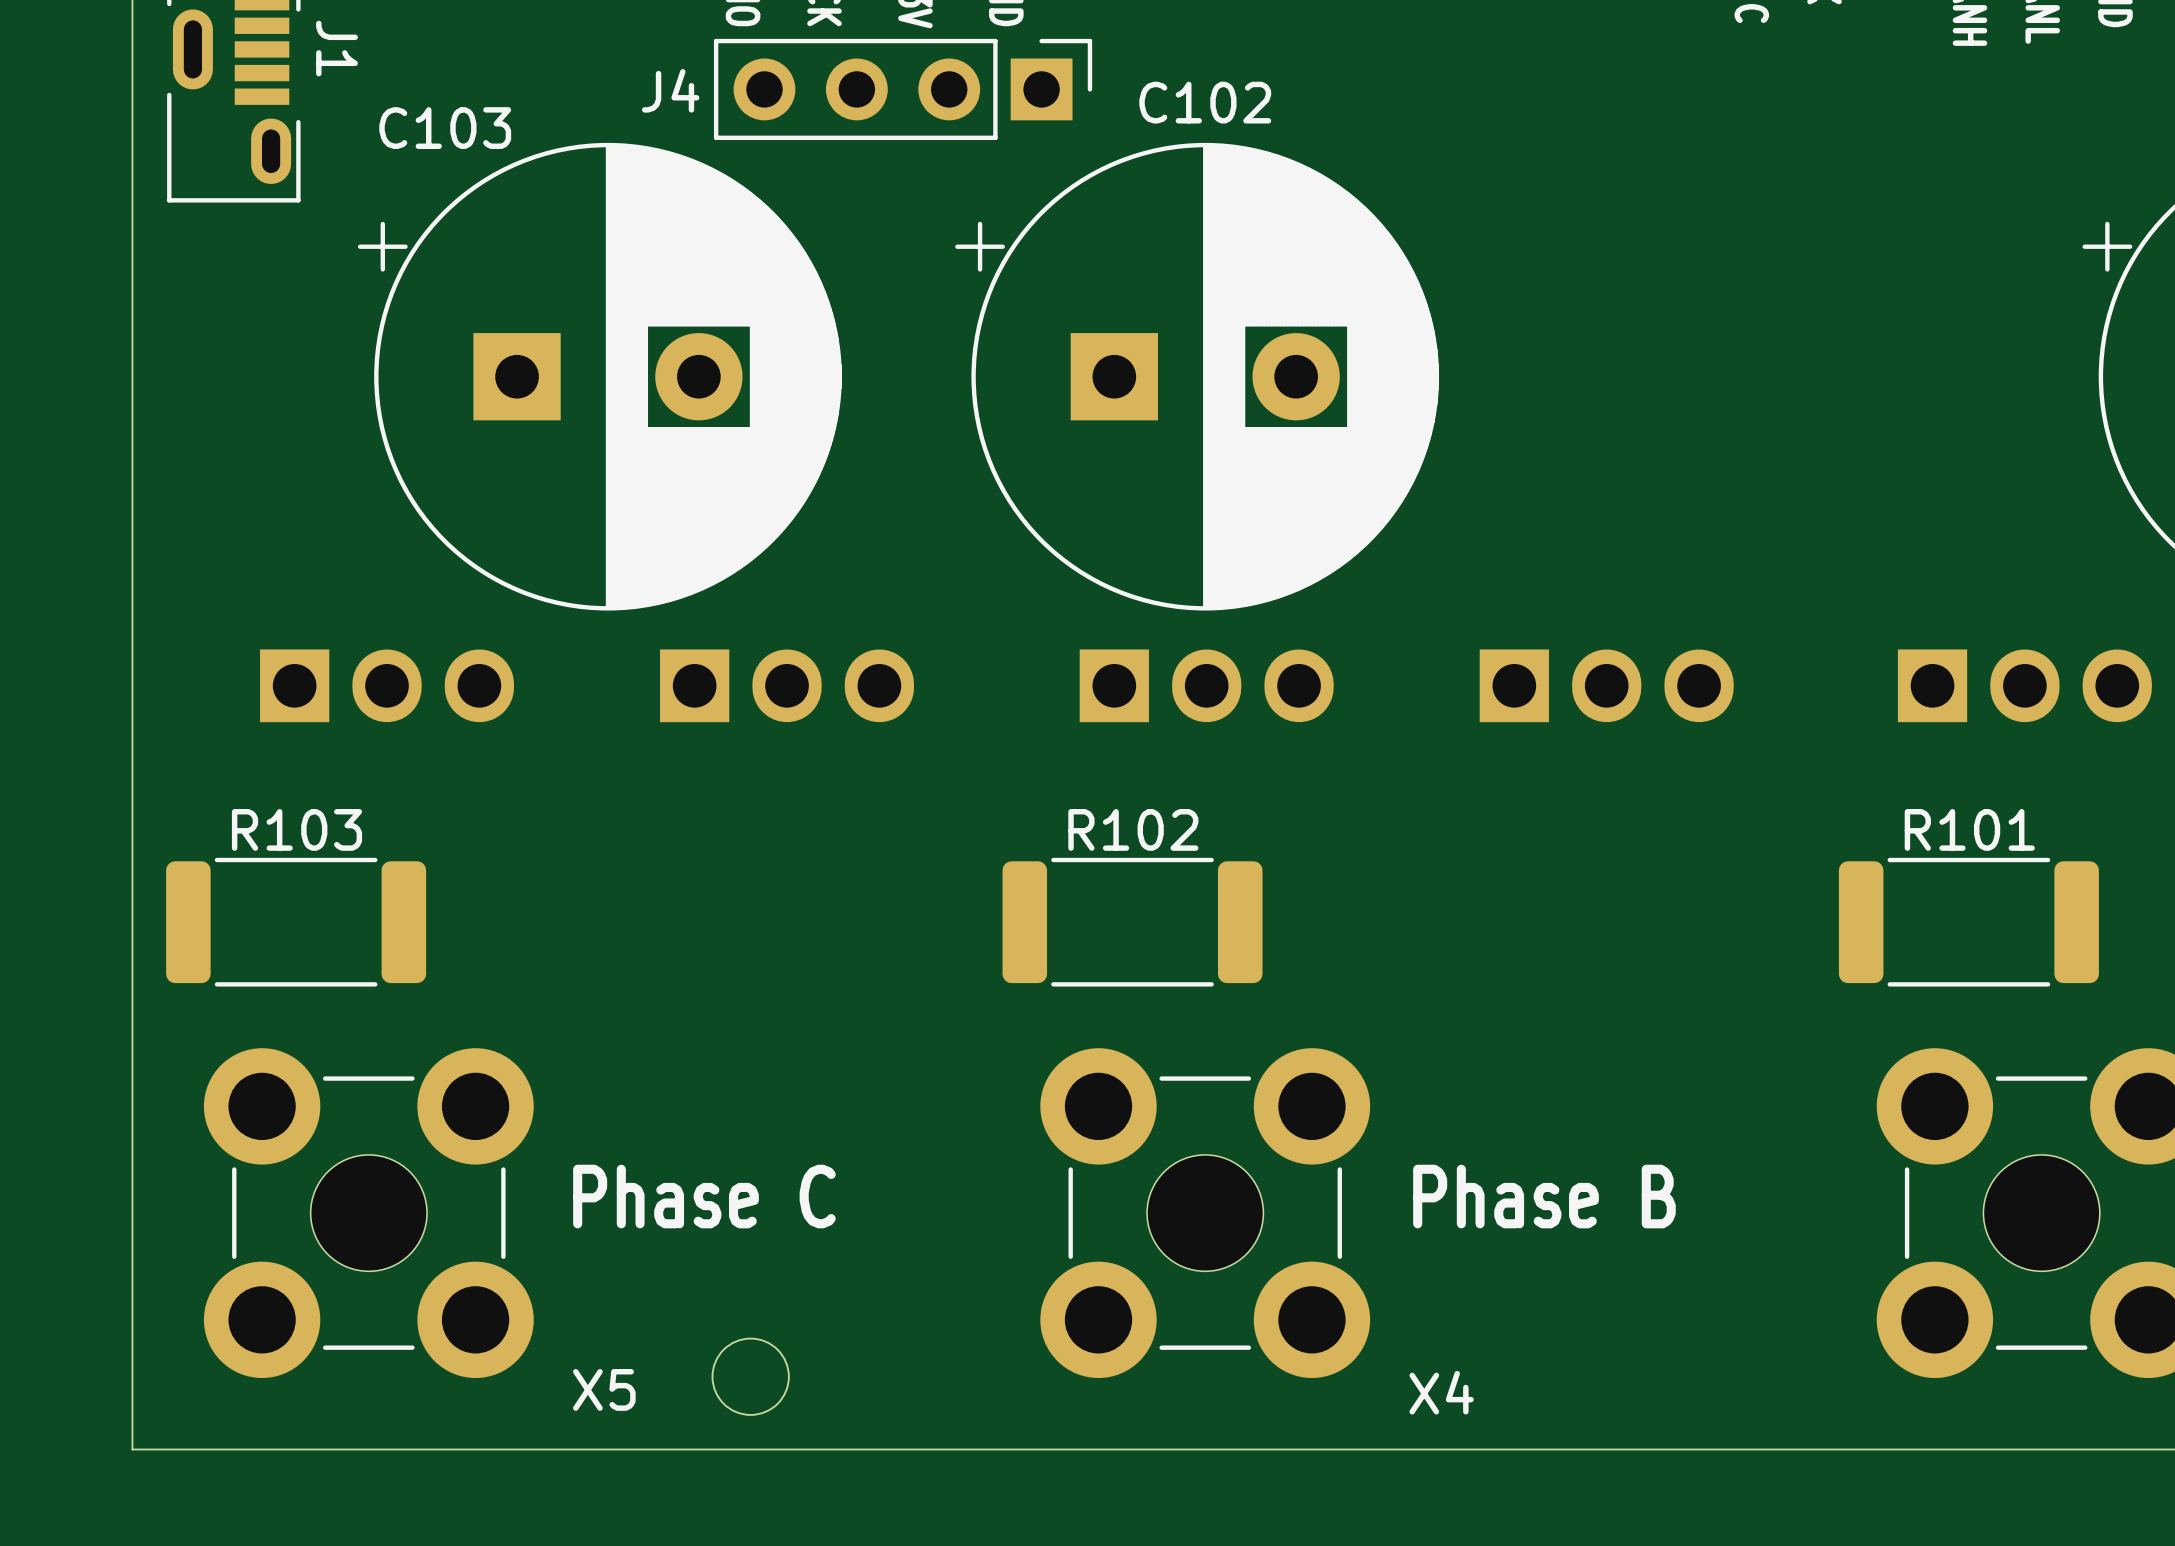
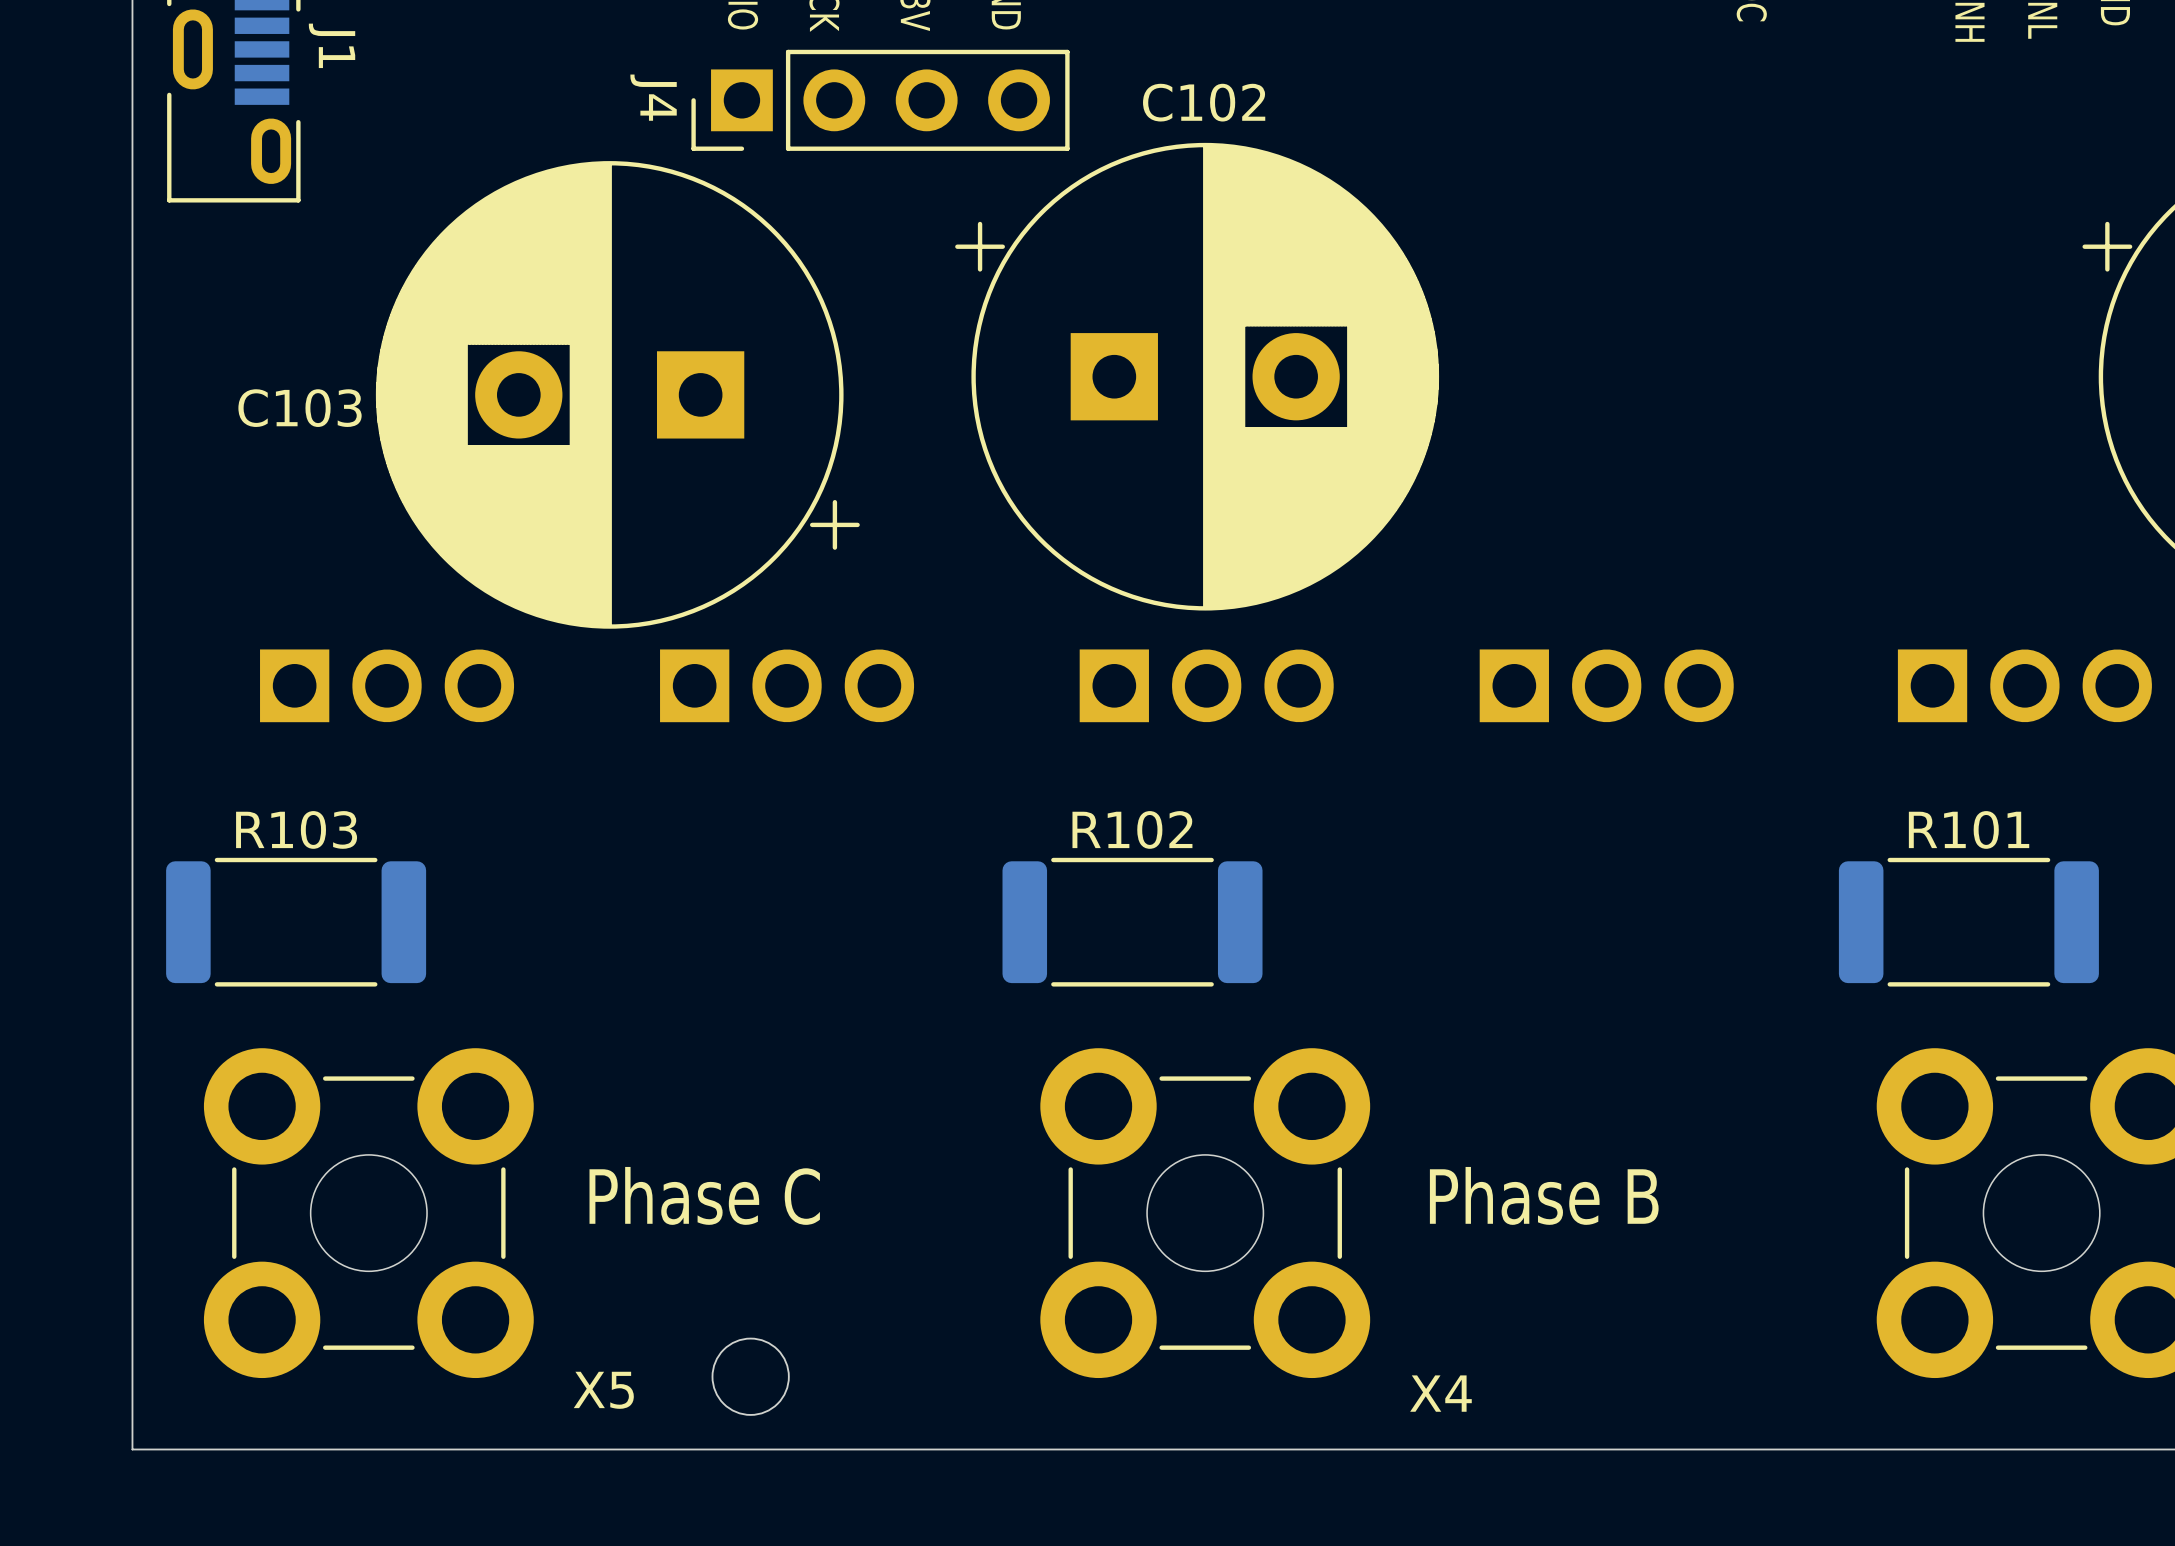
J4 rotation: 0° (903, 89) -> 180° (880, 100)
C103 name position: C103 (445, 128) -> C103 (300, 408)
C103 rotation: 0° (599, 376) -> 180° (617, 394)

